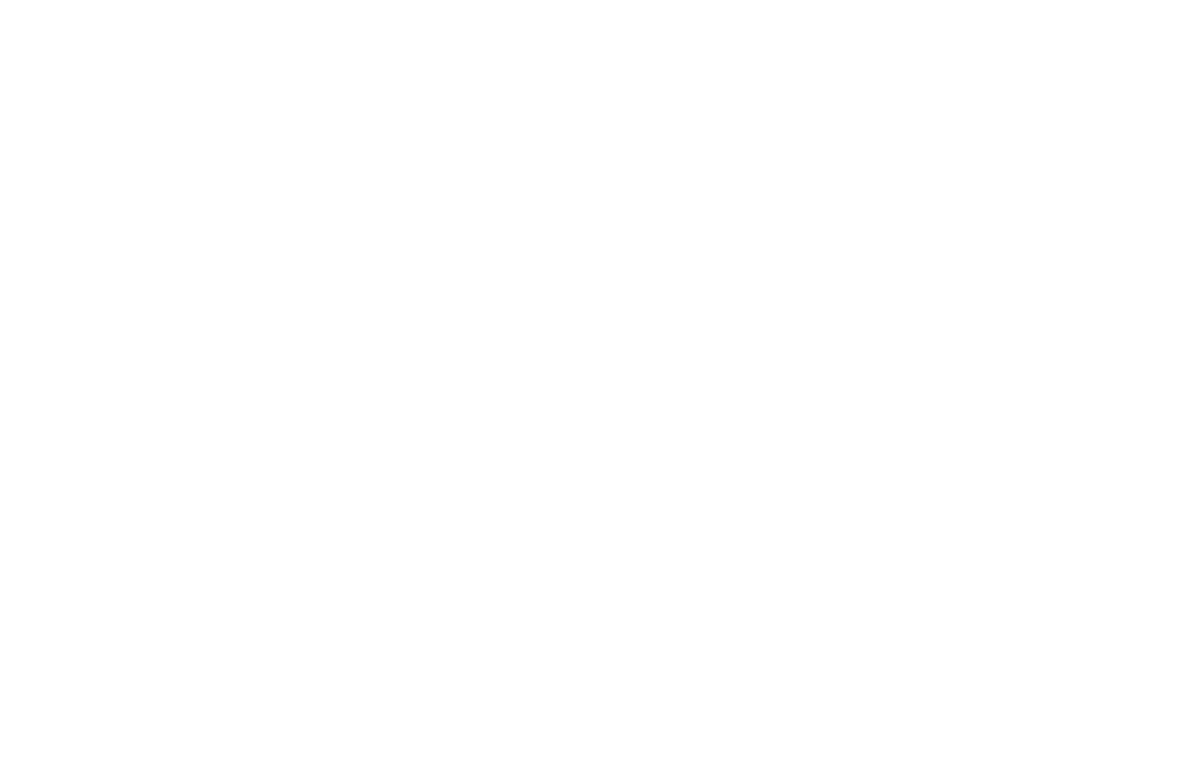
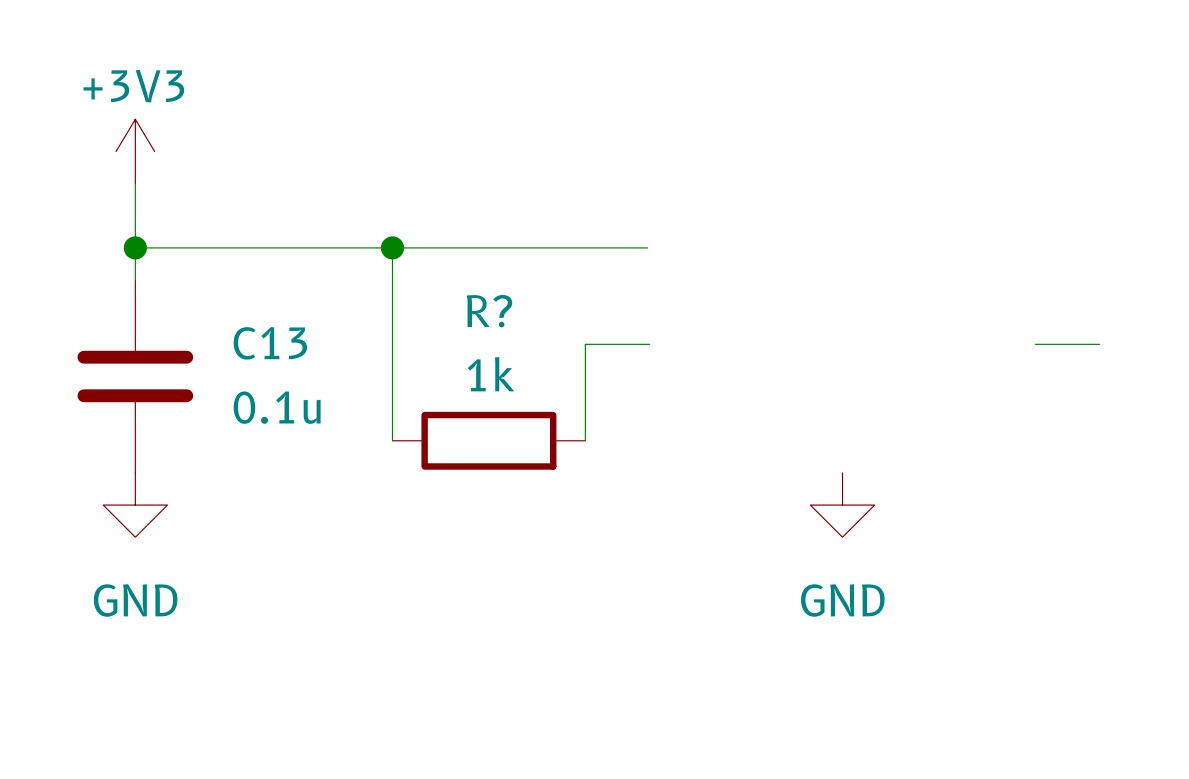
power symbol: none -> +3V3 (135, 151)
wire: none -> (135, 183) (135, 280)
wire: none -> (135, 247) (647, 247)
junction: none -> (135, 247)
wire: none -> (392, 247) (392, 440)
junction: none -> (392, 247)
wire: none -> (649, 344) (585, 344) (585, 440)
wire: none -> (1035, 344) (1099, 344)
C13: none -> 0.1u (135, 376)
R?: none -> 1k (488, 440)
power symbol: none -> GND (135, 505)
power symbol: none -> GND (842, 505)

